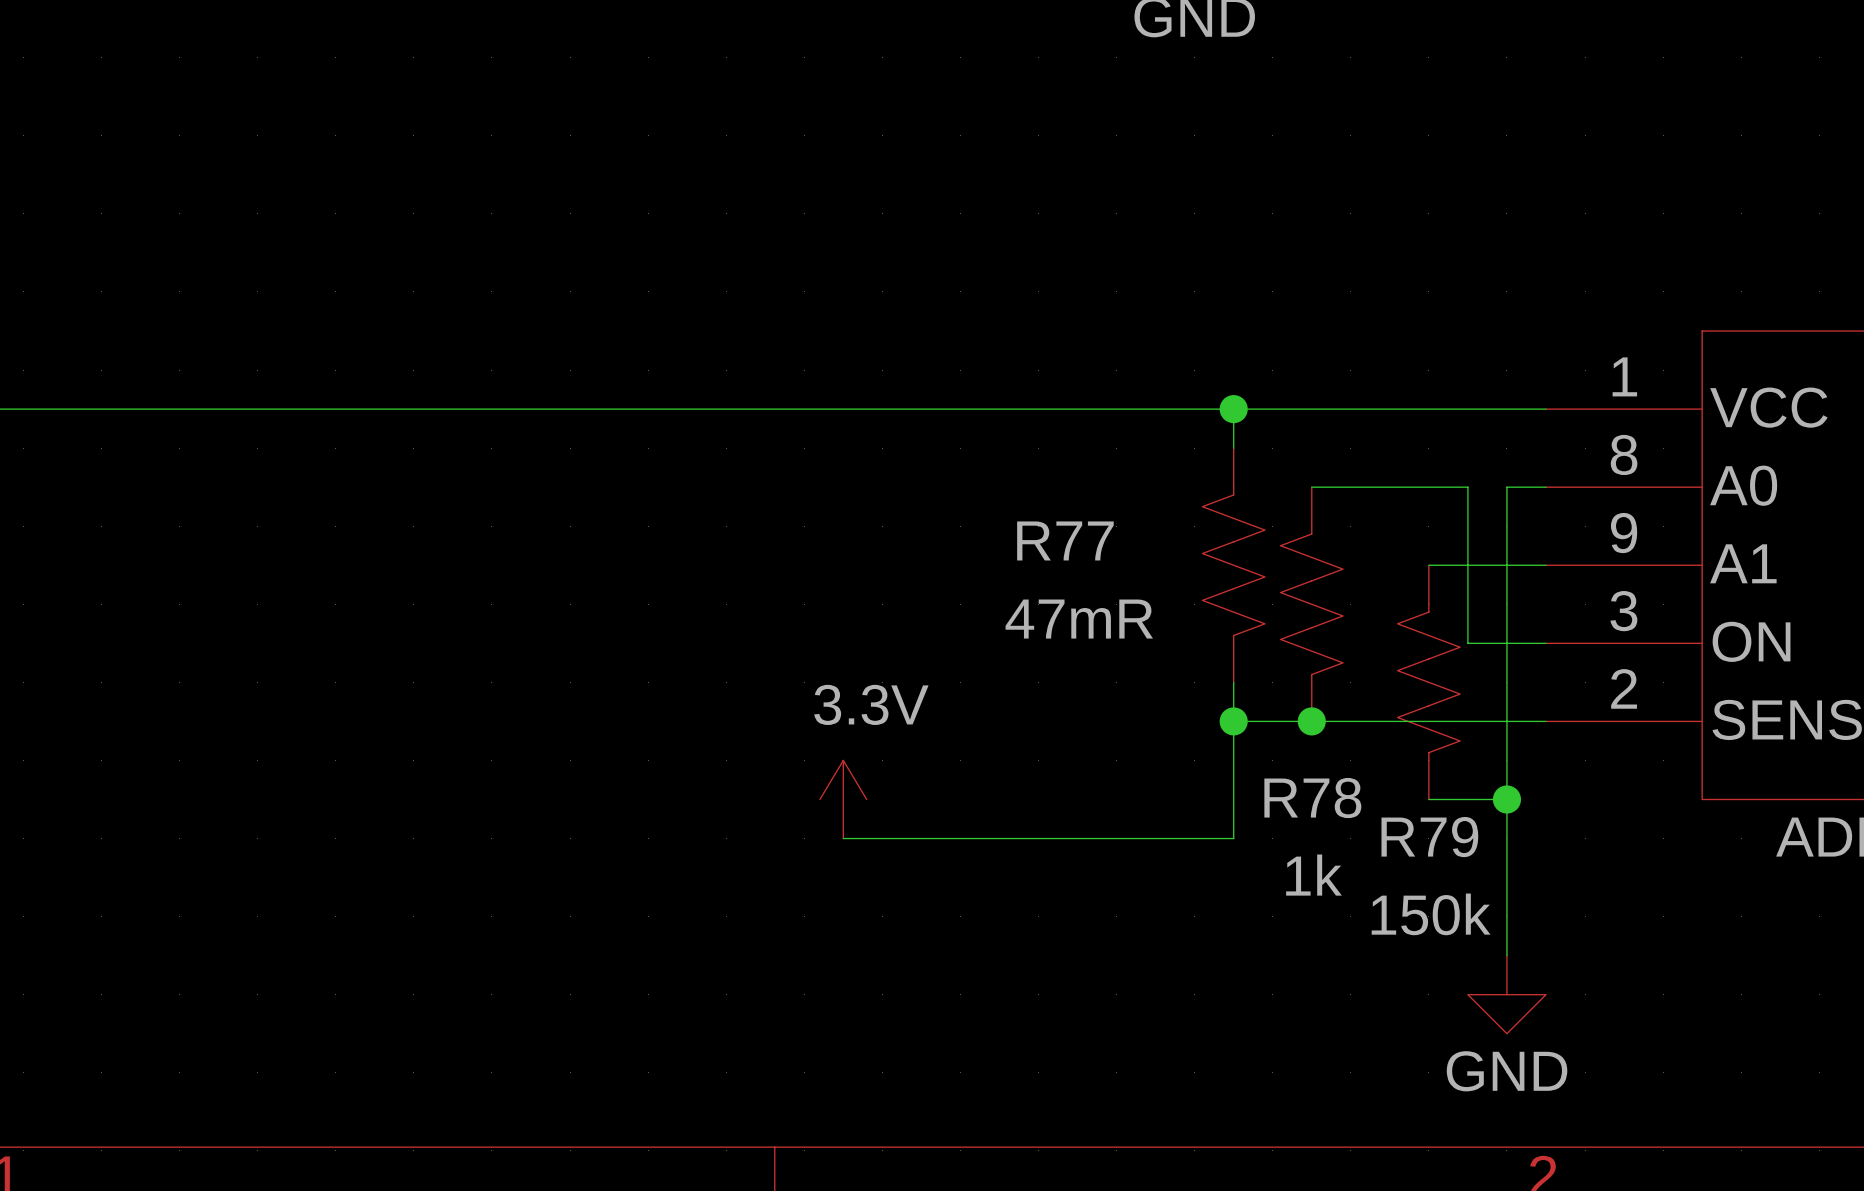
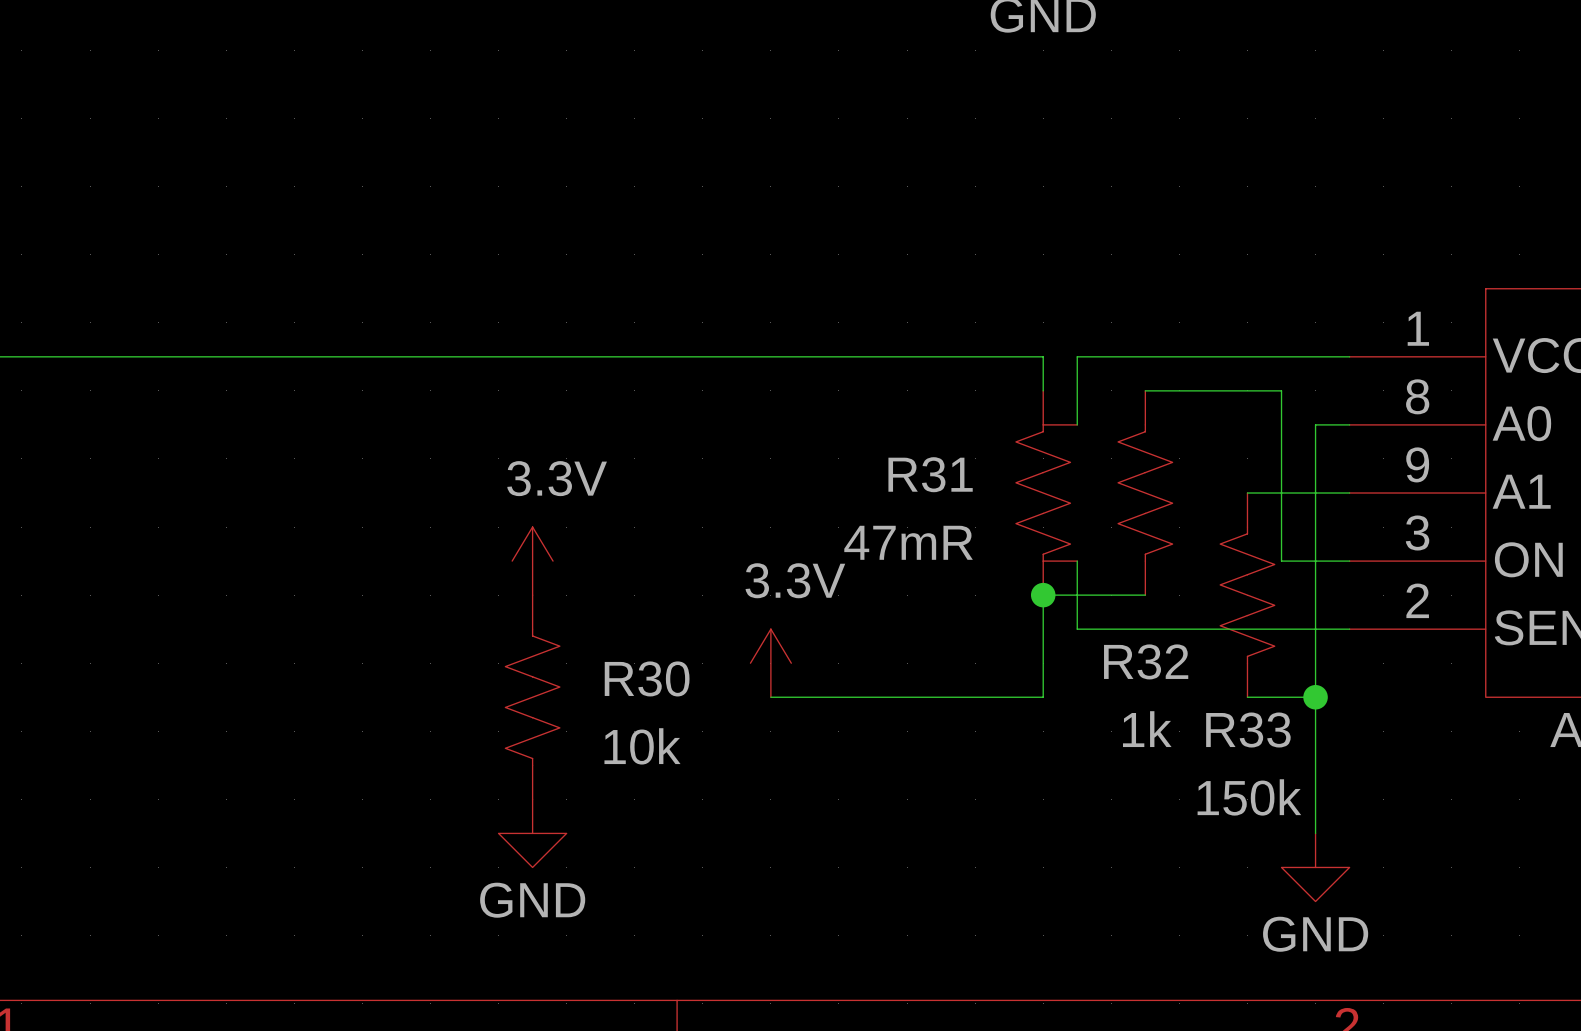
wire: (1194, 409) (1233, 409) -> (1043, 356) (1043, 390)
junction: (1233, 409) -> none
wire: (1311, 487) (1467, 487) -> (1145, 390) (1281, 390) (1281, 424)
R31: none -> 47mR (1046, 493)
R77: 47mR (1233, 565) -> none
R32: none -> 1k (1145, 493)
R78: 1k (1311, 604) -> none
power symbol: none -> 3.3V (532, 561)
wire: none -> (1145, 595) (1043, 595) (1043, 697) (770, 697)
wire: (1233, 721) (1233, 838) (843, 838) -> none
junction position: (1233, 721) -> (1043, 595)
junction: (1311, 721) -> none
R30: none -> 10k (532, 697)
power symbol position: 3.3V (843, 799) -> 3.3V (770, 663)
R79 name: R79 (1429, 837) -> R33 (1248, 730)
power symbol: none -> GND (532, 833)

